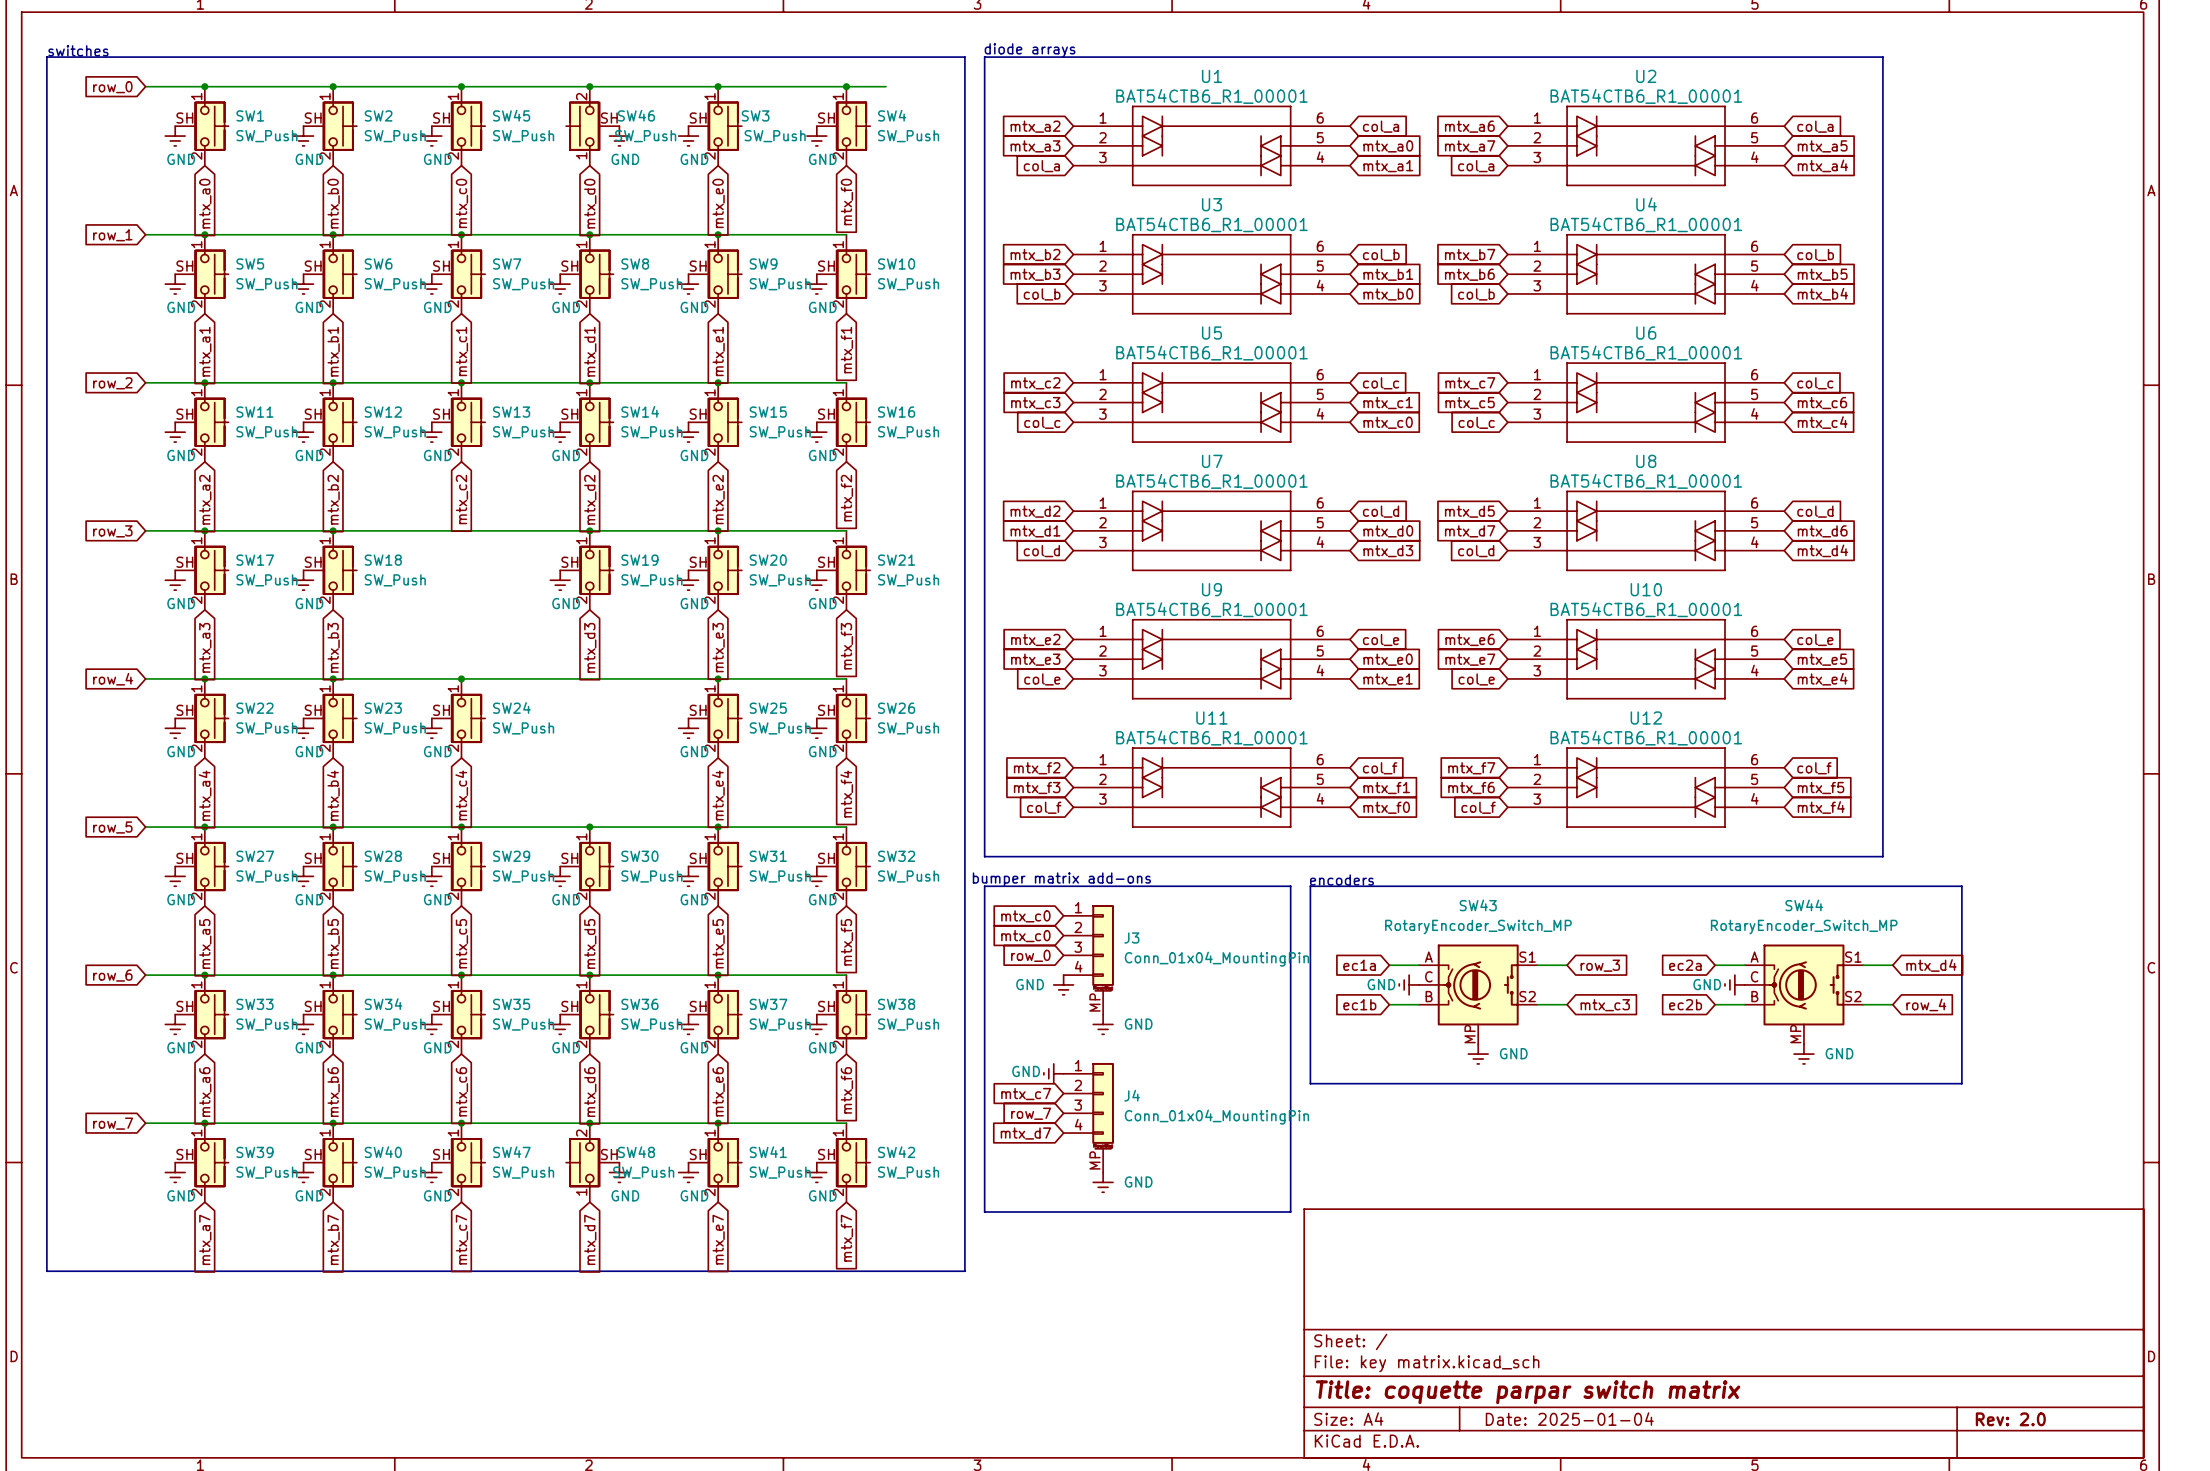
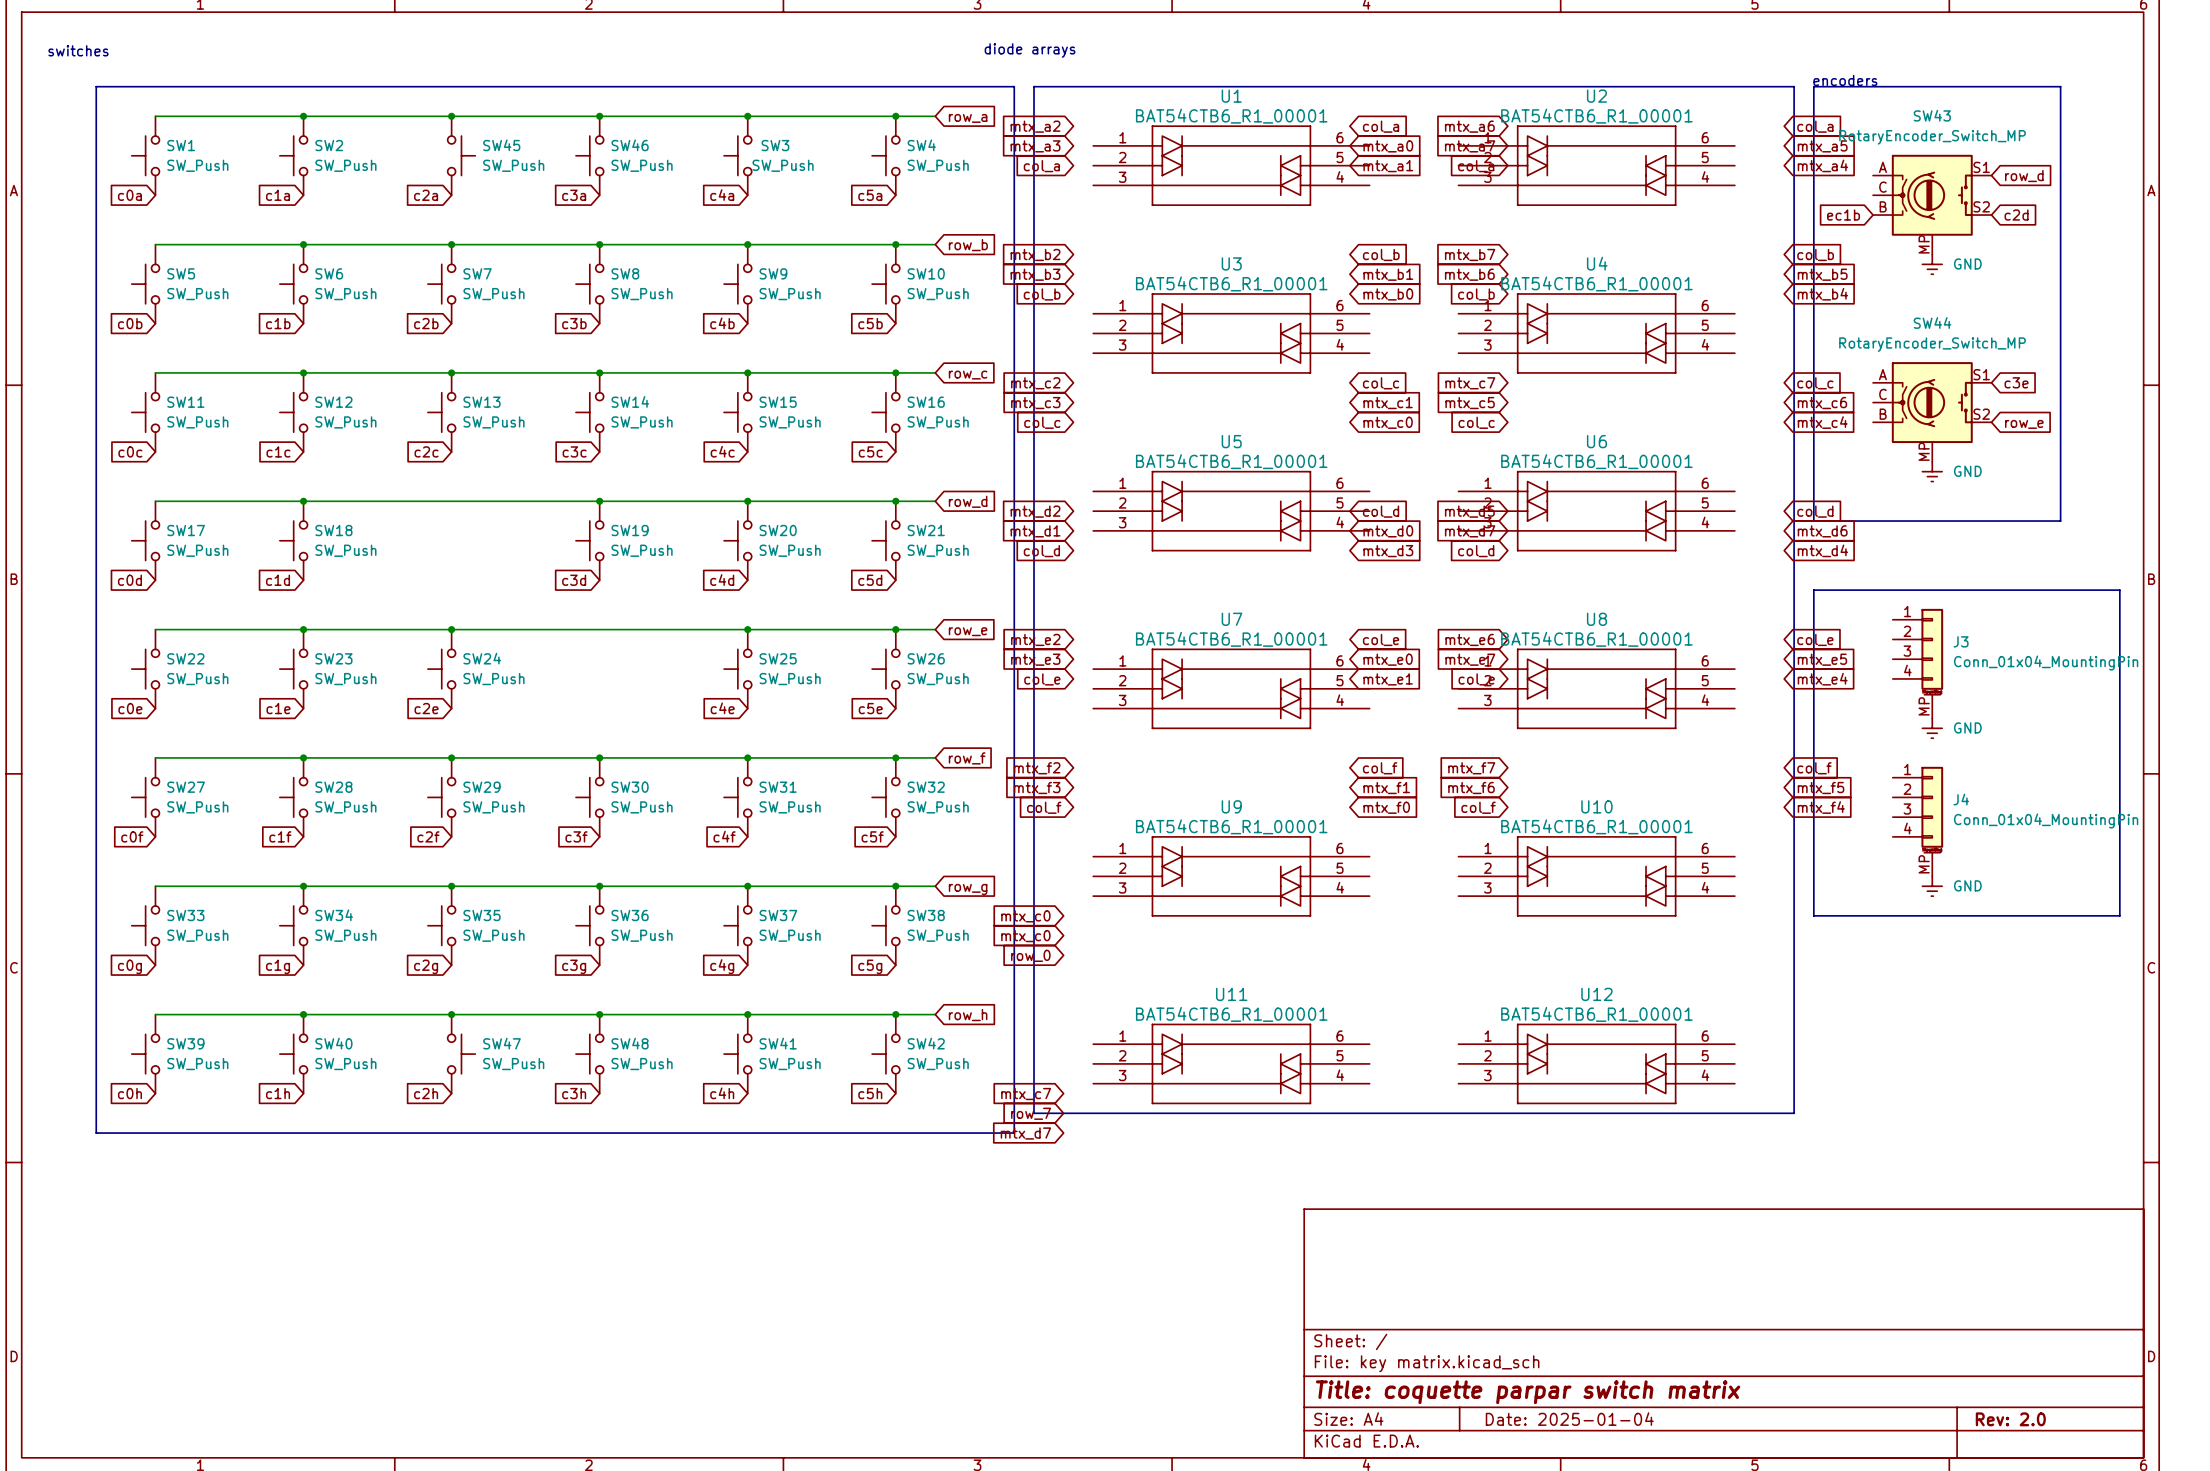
line: (46, 57) (964, 57) (964, 1271) (46, 1271) (46, 57) -> (96, 86) (96, 1133) (1014, 1133) (1014, 86) (96, 86)
line: (984, 57) (1882, 57) (1882, 856) (984, 856) (984, 57) -> (1034, 86) (1034, 1113) (1794, 1113) (1794, 86) (1034, 86)
text: none -> encoders (1845, 80)
SW1 symbol: [175, 86, 229, 166] -> [131, 116, 160, 196]
junction: (204, 86) -> none
SW2 symbol: [303, 86, 357, 166] -> [279, 116, 308, 196]
junction position: (333, 86) -> (303, 116)
SW45 symbol: [431, 86, 486, 166] -> [447, 116, 476, 196]
junction position: (461, 86) -> (451, 116)
SW46 symbol: [566, 86, 620, 166] -> [575, 116, 604, 196]
junction position: (589, 86) -> (599, 116)
SW3 symbol: [688, 86, 742, 166] -> [724, 116, 752, 196]
junction position: (718, 86) -> (747, 116)
SW4 symbol: [816, 86, 871, 166] -> [872, 116, 900, 196]
junction: (846, 86) -> none
line: none -> (1813, 86) (2060, 86) (2060, 521) (1813, 521) (1813, 86)
global label: row_0 (112, 87) -> none
wire: none -> (155, 116) (935, 116)
junction: none -> (895, 116)
global label: none -> row_a (968, 118)
power symbol: GND (175, 136) -> none
power symbol: GND (303, 136) -> none
power symbol: GND (431, 136) -> none
power symbol: GND (619, 136) -> none
power symbol: GND (688, 136) -> none
power symbol: GND (816, 136) -> none
U1 position: (1211, 145) -> (1231, 165)
U2 position: (1646, 145) -> (1596, 165)
global label: none -> row_d (2024, 176)
global label: none -> c0a (129, 195)
global label: none -> c1a (278, 195)
global label: none -> c2a (426, 195)
global label: none -> c3a (574, 195)
global label: none -> c4a (722, 195)
global label: none -> c5a (870, 195)
global label: mtx_f0 (846, 201) -> none
global label: mtx_a0 (205, 203) -> none
global label: mtx_b0 (333, 203) -> none
global label: mtx_c0 (461, 203) -> none
global label: mtx_d0 (590, 203) -> none
global label: mtx_e0 (718, 203) -> none
global label: none -> ec1b (1843, 215)
global label: none -> c2d (2016, 215)
wire: (145, 234) (846, 234) -> none
SW5 symbol: [175, 234, 229, 314] -> [131, 244, 160, 324]
junction: (204, 234) -> none
SW6 symbol: [303, 234, 357, 314] -> [279, 244, 308, 324]
junction position: (333, 234) -> (303, 244)
SW7 symbol: [431, 234, 486, 314] -> [427, 244, 456, 324]
junction position: (461, 234) -> (451, 244)
SW8 symbol: [560, 234, 614, 314] -> [575, 244, 604, 324]
junction position: (589, 234) -> (599, 244)
SW9 symbol: [688, 234, 742, 314] -> [724, 244, 752, 324]
junction position: (718, 234) -> (747, 244)
SW10 symbol: [816, 234, 871, 314] -> [872, 244, 900, 324]
global label: row_1 (112, 235) -> none
wire: none -> (155, 244) (935, 244)
junction: none -> (895, 244)
global label: none -> row_b (968, 245)
power symbol: none -> GND (1932, 264)
U3 position: (1211, 274) -> (1231, 333)
U4 position: (1646, 274) -> (1596, 333)
power symbol: GND (175, 284) -> none
power symbol: GND (303, 284) -> none
power symbol: GND (431, 284) -> none
power symbol: GND (560, 284) -> none
power symbol: GND (688, 284) -> none
power symbol: GND (816, 284) -> none
global label: none -> c0b (130, 323)
global label: none -> c1b (278, 323)
global label: none -> c2b (426, 323)
global label: none -> c3b (574, 323)
global label: none -> c4b (722, 323)
global label: none -> c5b (870, 323)
global label: mtx_f1 (846, 350) -> none
global label: mtx_a1 (205, 351) -> none
global label: mtx_b1 (333, 351) -> none
global label: mtx_c1 (461, 351) -> none
global label: mtx_d1 (590, 351) -> none
global label: mtx_e1 (718, 351) -> none
wire: none -> (155, 372) (935, 372)
junction: none -> (895, 372)
global label: none -> row_c (968, 375)
wire: (145, 382) (846, 382) -> none
SW11 symbol: [175, 382, 229, 462] -> [131, 372, 160, 452]
junction: (204, 382) -> none
SW12 symbol: [303, 382, 357, 462] -> [279, 372, 308, 452]
junction position: (333, 382) -> (303, 372)
SW13 symbol: [431, 382, 486, 462] -> [427, 372, 456, 452]
junction position: (461, 382) -> (451, 372)
SW14 symbol: [560, 382, 614, 462] -> [575, 372, 604, 452]
junction position: (589, 382) -> (599, 372)
SW15 symbol: [688, 382, 742, 462] -> [724, 372, 752, 452]
junction position: (718, 382) -> (747, 372)
SW16 symbol: [816, 382, 871, 462] -> [872, 372, 900, 452]
global label: none -> c3e (2016, 382)
global label: row_2 (112, 383) -> none
U5 position: (1211, 402) -> (1231, 511)
U6 position: (1646, 402) -> (1596, 511)
global label: none -> row_e (2024, 424)
power symbol: GND (175, 432) -> none
power symbol: GND (303, 432) -> none
power symbol: GND (431, 432) -> none
power symbol: GND (560, 432) -> none
power symbol: GND (688, 432) -> none
power symbol: GND (816, 432) -> none
global label: none -> c0c (130, 451)
global label: none -> c1c (278, 451)
global label: none -> c2c (426, 451)
global label: none -> c3c (574, 451)
global label: none -> c4c (722, 451)
global label: none -> c5c (870, 451)
power symbol: none -> GND (1932, 471)
global label: mtx_f2 (846, 498) -> none
global label: mtx_a2 (205, 499) -> none
global label: mtx_b2 (333, 499) -> none
global label: mtx_c2 (461, 499) -> none
global label: mtx_d2 (590, 499) -> none
global label: mtx_e2 (718, 499) -> none
wire: none -> (155, 501) (935, 501)
junction: none -> (895, 501)
global label: none -> row_d (968, 501)
wire: (145, 530) (846, 530) -> none
SW17 symbol: [175, 530, 229, 610] -> [131, 501, 160, 581]
junction: (204, 530) -> none
SW18 symbol: [303, 530, 357, 610] -> [279, 501, 308, 581]
junction position: (333, 530) -> (303, 501)
SW19 symbol: [560, 530, 614, 610] -> [575, 501, 604, 581]
junction position: (589, 530) -> (599, 501)
SW20 symbol: [688, 530, 742, 610] -> [724, 501, 752, 581]
junction position: (718, 530) -> (747, 501)
SW21 symbol: [816, 530, 871, 610] -> [872, 501, 900, 581]
U7 position: (1211, 530) -> (1231, 688)
U8 position: (1646, 530) -> (1596, 688)
global label: row_3 (112, 531) -> none
global label: none -> c0d (129, 580)
power symbol: GND (175, 580) -> none
global label: none -> c1d (278, 580)
power symbol: GND (303, 580) -> none
power symbol: GND (560, 580) -> none
global label: none -> c3d (574, 580)
power symbol: GND (688, 580) -> none
global label: none -> c4d (722, 580)
power symbol: GND (816, 580) -> none
global label: none -> c5d (870, 580)
line: none -> (1813, 590) (1813, 915) (2119, 915) (2119, 590) (1813, 590)
wire: none -> (155, 629) (935, 629)
junction: none -> (303, 629)
junction: none -> (451, 629)
junction: none -> (747, 629)
junction: none -> (895, 629)
global label: none -> row_e (968, 631)
global label: mtx_f3 (846, 646) -> none
global label: mtx_a3 (205, 647) -> none
global label: mtx_b3 (333, 647) -> none
global label: mtx_d3 (590, 647) -> none
global label: mtx_e3 (718, 647) -> none
U9 position: (1211, 659) -> (1231, 876)
U10 position: (1646, 659) -> (1596, 876)
wire: (145, 678) (846, 678) -> none
SW22 symbol: [175, 678, 229, 758] -> [131, 629, 160, 709]
junction: (204, 678) -> none
SW23 symbol: [303, 678, 357, 758] -> [279, 629, 308, 709]
junction: (333, 678) -> none
SW24 symbol: [431, 678, 486, 758] -> [427, 629, 456, 709]
junction: (461, 678) -> none
SW25 symbol: [688, 678, 742, 758] -> [724, 629, 752, 709]
junction: (718, 678) -> none
SW26 symbol: [816, 678, 871, 758] -> [872, 629, 900, 709]
global label: row_4 (113, 679) -> none
global label: none -> c0e (130, 708)
global label: none -> c1e (278, 708)
global label: none -> c2e (426, 708)
global label: none -> c4e (722, 708)
global label: none -> c5e (870, 708)
power symbol: GND (175, 728) -> none
power symbol: GND (303, 728) -> none
power symbol: GND (431, 728) -> none
power symbol: GND (688, 728) -> none
power symbol: GND (816, 728) -> none
power symbol: none -> GND (1932, 728)
wire: none -> (155, 757) (935, 757)
junction: none -> (303, 757)
junction: none -> (451, 757)
junction: none -> (599, 757)
junction: none -> (747, 757)
junction: none -> (895, 757)
global label: none -> row_f (967, 758)
U11 position: (1211, 787) -> (1231, 1063)
U12 position: (1646, 787) -> (1596, 1063)
global label: mtx_f4 (846, 794) -> none
global label: mtx_a4 (205, 795) -> none
global label: mtx_b4 (333, 795) -> none
global label: mtx_c4 (461, 795) -> none
global label: mtx_e4 (718, 795) -> none
global label: row_5 (112, 827) -> none
wire: (145, 827) (846, 827) -> none
SW27 symbol: [175, 827, 229, 907] -> [131, 757, 160, 837]
junction: (204, 827) -> none
SW28 symbol: [303, 827, 357, 907] -> [279, 757, 308, 837]
junction: (333, 827) -> none
SW29 symbol: [431, 827, 486, 907] -> [427, 757, 456, 837]
junction: (461, 827) -> none
SW30 symbol: [560, 827, 614, 907] -> [575, 757, 604, 837]
junction: (589, 827) -> none
SW31 symbol: [688, 827, 742, 907] -> [724, 757, 752, 837]
junction: (718, 827) -> none
SW32 symbol: [816, 827, 871, 907] -> [872, 757, 900, 837]
global label: none -> c0f (132, 836)
global label: none -> c1f (280, 836)
global label: none -> c2f (428, 836)
global label: none -> c3f (576, 836)
global label: none -> c4f (724, 836)
global label: none -> c5f (872, 836)
power symbol: GND (175, 876) -> none
power symbol: GND (303, 876) -> none
power symbol: GND (431, 876) -> none
power symbol: GND (560, 876) -> none
power symbol: GND (688, 876) -> none
power symbol: GND (816, 876) -> none
text: bumper matrix add-ons (1061, 879) -> none
text: encoders (1341, 879) -> none
wire: none -> (155, 886) (935, 886)
junction: none -> (303, 886)
junction: none -> (451, 886)
junction: none -> (599, 886)
junction: none -> (747, 886)
junction: none -> (895, 886)
line: (984, 886) (1290, 886) (1290, 1212) (984, 1212) (984, 886) -> none
line: (1310, 886) (1961, 886) (1961, 1083) (1310, 1083) (1310, 886) -> none
power symbol: none -> GND (1932, 886)
global label: none -> row_g (968, 889)
global label: mtx_f5 (846, 942) -> none
global label: mtx_a5 (205, 943) -> none
global label: mtx_b5 (333, 943) -> none
global label: mtx_c5 (461, 943) -> none
global label: mtx_d5 (590, 943) -> none
global label: mtx_e5 (718, 943) -> none
J3 position: (1088, 959) -> (1917, 663)
global label: ec1a (1359, 965) -> none
wire: (1389, 965) (1418, 965) -> none
wire: (1537, 965) (1567, 965) -> none
global label: row_3 (1600, 965) -> none
global label: ec2a (1685, 965) -> none
wire: (1715, 965) (1744, 965) -> none
wire: (1863, 965) (1892, 965) -> none
global label: mtx_d4 (1931, 965) -> none
global label: none -> c0g (129, 966)
global label: none -> c1g (278, 966)
global label: none -> c2g (426, 966)
global label: none -> c3g (574, 966)
global label: none -> c4g (722, 966)
global label: none -> c5g (870, 966)
global label: row_6 (112, 975) -> none
wire: (145, 975) (846, 975) -> none
SW33 symbol: [175, 975, 229, 1055] -> [131, 886, 160, 966]
junction: (204, 975) -> none
SW34 symbol: [303, 975, 357, 1055] -> [279, 886, 308, 966]
junction: (333, 975) -> none
SW35 symbol: [431, 975, 486, 1055] -> [427, 886, 456, 966]
junction position: (461, 975) -> (451, 1014)
SW36 symbol: [560, 975, 614, 1055] -> [575, 886, 604, 966]
junction position: (589, 975) -> (599, 1014)
SW37 symbol: [688, 975, 742, 1055] -> [724, 886, 752, 966]
junction: (718, 975) -> none
SW38 symbol: [816, 975, 871, 1055] -> [872, 886, 900, 966]
power symbol: GND (1063, 984) -> none
power symbol: GND (1409, 984) -> none
power symbol: GND (1734, 984) -> none
SW43 position: (1478, 994) -> (1932, 204)
SW44 position: (1803, 994) -> (1932, 411)
global label: ec1b (1359, 1004) -> none
wire: (1389, 1004) (1418, 1004) -> none
wire: (1537, 1004) (1567, 1004) -> none
global label: ec2b (1685, 1004) -> none
wire: (1715, 1004) (1744, 1004) -> none
wire: (1863, 1004) (1892, 1004) -> none
global label: row_4 (1926, 1004) -> none
global label: mtx_c3 (1605, 1005) -> none
wire: none -> (155, 1014) (935, 1014)
junction: none -> (303, 1014)
junction: none -> (747, 1014)
junction: none -> (895, 1014)
global label: none -> row_h (968, 1015)
power symbol: GND (175, 1024) -> none
power symbol: GND (303, 1024) -> none
power symbol: GND (431, 1024) -> none
power symbol: GND (560, 1024) -> none
power symbol: GND (688, 1024) -> none
power symbol: GND (816, 1024) -> none
power symbol: GND (1103, 1024) -> none
power symbol: GND (1478, 1054) -> none
power symbol: GND (1803, 1054) -> none
power symbol: GND (1053, 1073) -> none
global label: mtx_f6 (846, 1090) -> none
global label: mtx_c6 (461, 1091) -> none
global label: mtx_e6 (718, 1091) -> none
global label: mtx_a6 (205, 1092) -> none
global label: mtx_b6 (333, 1092) -> none
global label: mtx_d6 (590, 1092) -> none
global label: none -> c0h (129, 1093)
global label: none -> c1h (278, 1093)
global label: none -> c2h (426, 1093)
global label: none -> c3h (574, 1093)
global label: none -> c4h (722, 1093)
global label: none -> c5h (870, 1093)
J4 position: (1088, 1117) -> (1917, 821)
global label: row_7 (113, 1123) -> none
wire: (145, 1123) (846, 1123) -> none
SW39 symbol: [175, 1123, 229, 1203] -> [131, 1014, 160, 1094]
junction: (204, 1123) -> none
SW40 symbol: [303, 1123, 357, 1203] -> [279, 1014, 308, 1094]
junction: (333, 1123) -> none
SW47 symbol: [431, 1123, 486, 1203] -> [447, 1014, 476, 1094]
junction: (461, 1123) -> none
SW48 symbol: [566, 1123, 620, 1203] -> [575, 1014, 604, 1094]
junction: (589, 1123) -> none
SW41 symbol: [688, 1123, 742, 1203] -> [724, 1014, 752, 1094]
junction: (718, 1123) -> none
SW42 symbol: [816, 1123, 871, 1203] -> [872, 1014, 900, 1094]
power symbol: GND (175, 1172) -> none
power symbol: GND (303, 1172) -> none
power symbol: GND (431, 1172) -> none
power symbol: GND (619, 1172) -> none
power symbol: GND (688, 1172) -> none
power symbol: GND (816, 1172) -> none
power symbol: GND (1103, 1182) -> none
global label: mtx_f7 (846, 1238) -> none
global label: mtx_a7 (205, 1239) -> none
global label: mtx_b7 (333, 1239) -> none
global label: mtx_c7 (461, 1239) -> none
global label: mtx_d7 (590, 1239) -> none
global label: mtx_e7 (718, 1239) -> none

